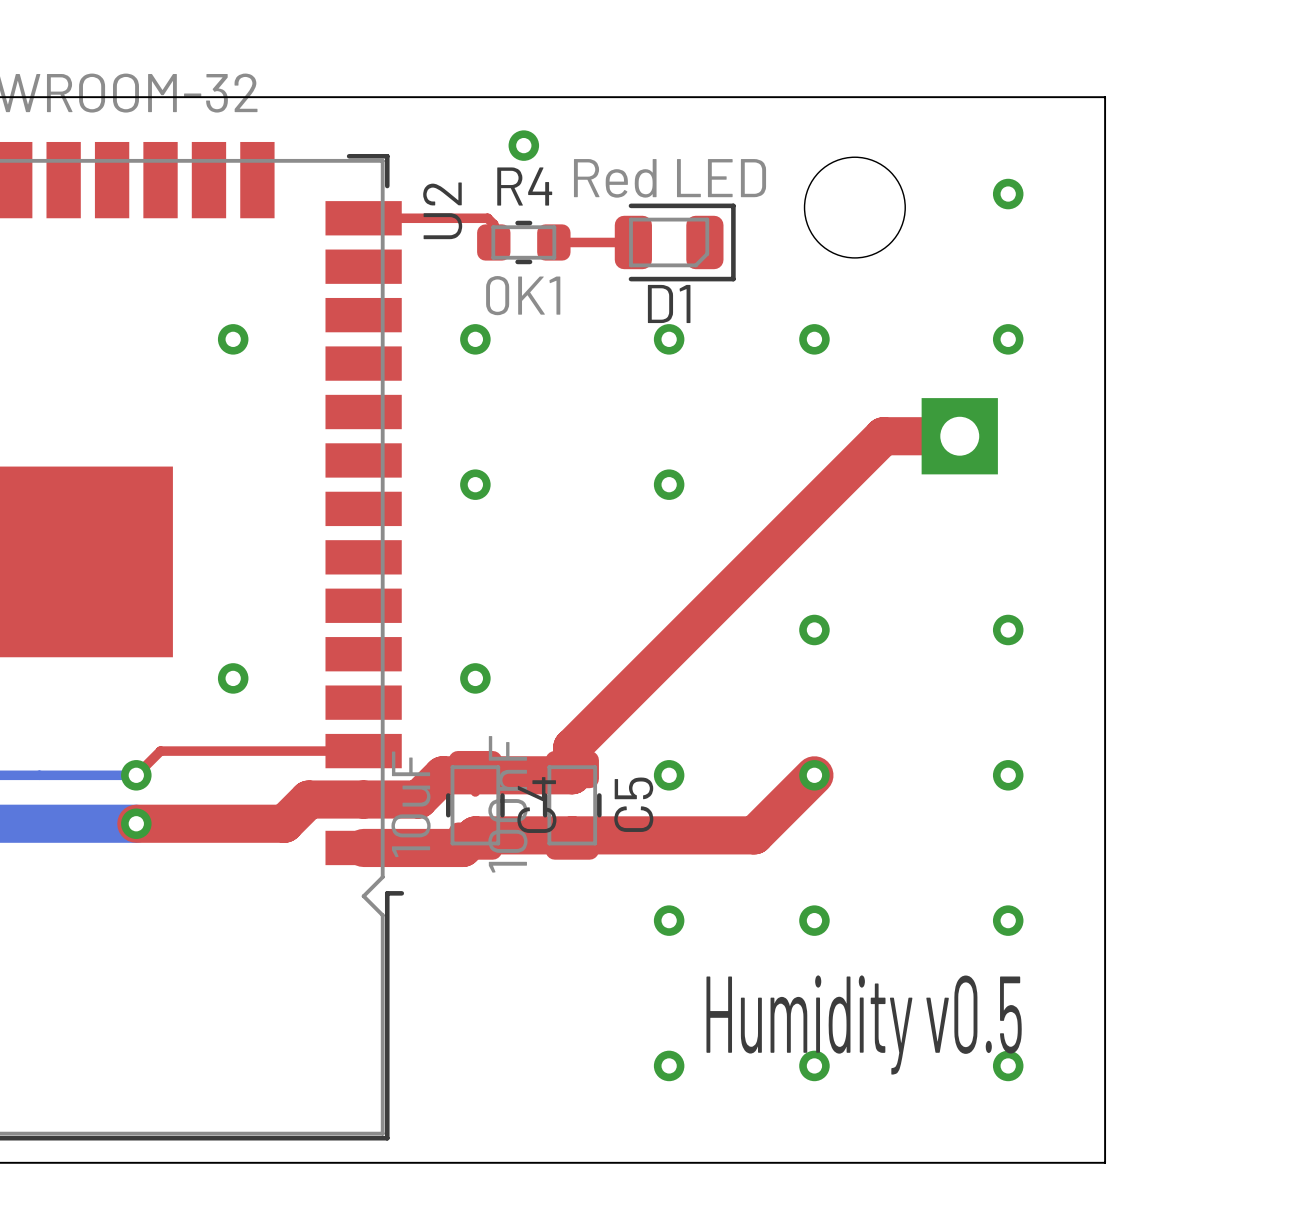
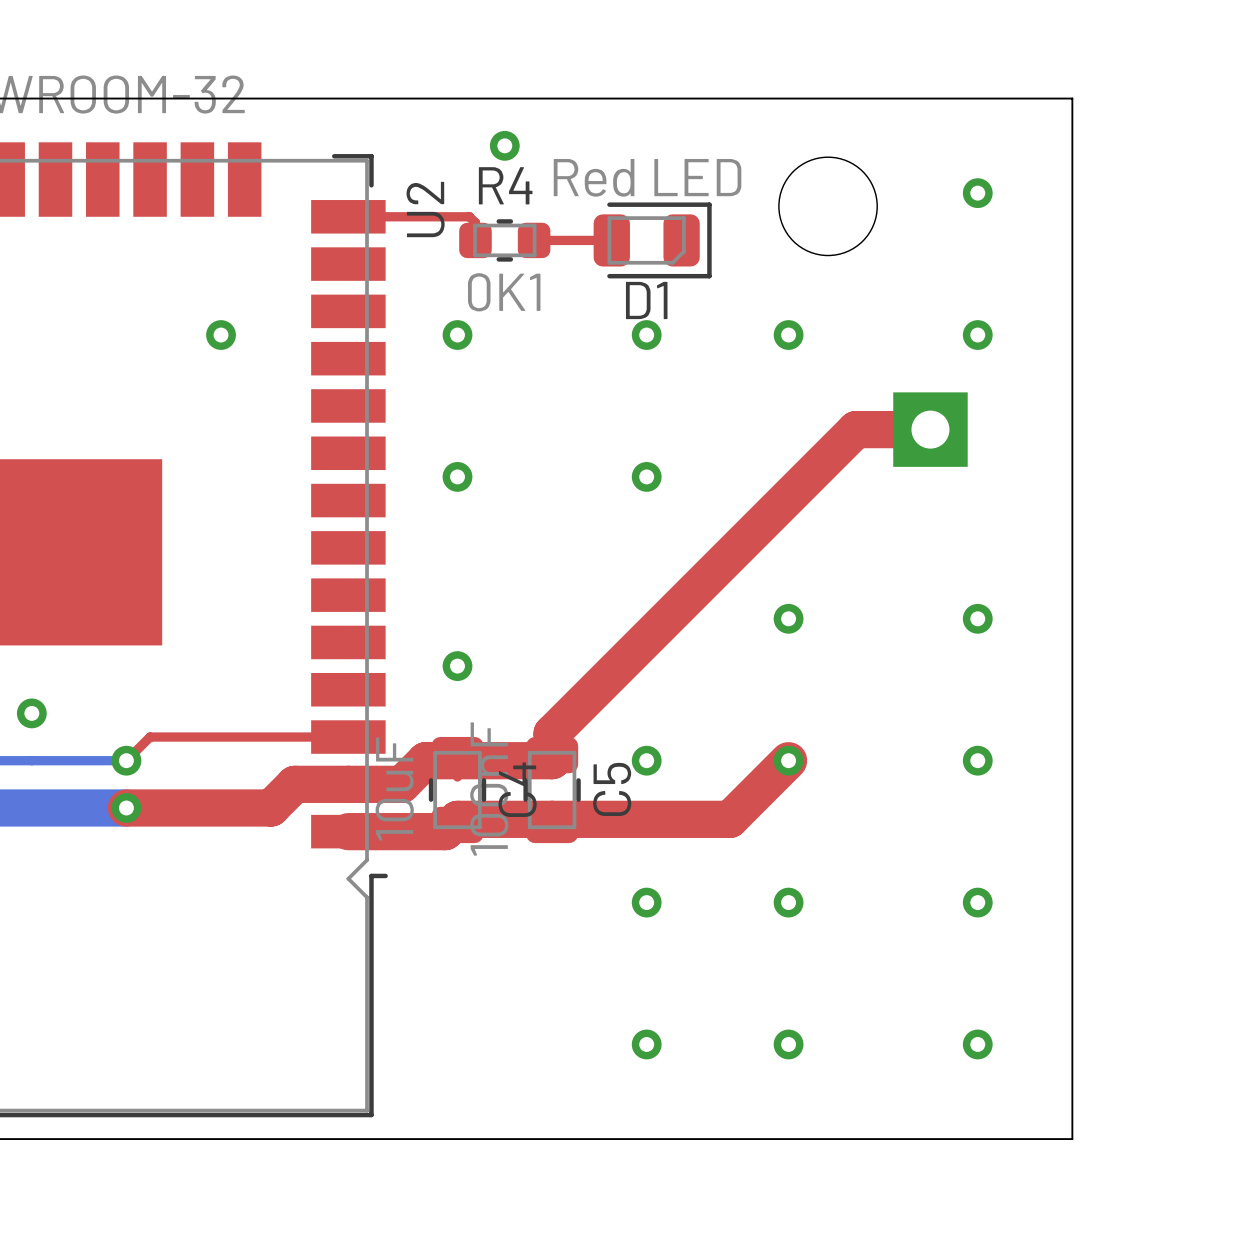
via position: (233, 678) -> (31, 713)
text: Humidity v0.5 (864, 1025) -> none

